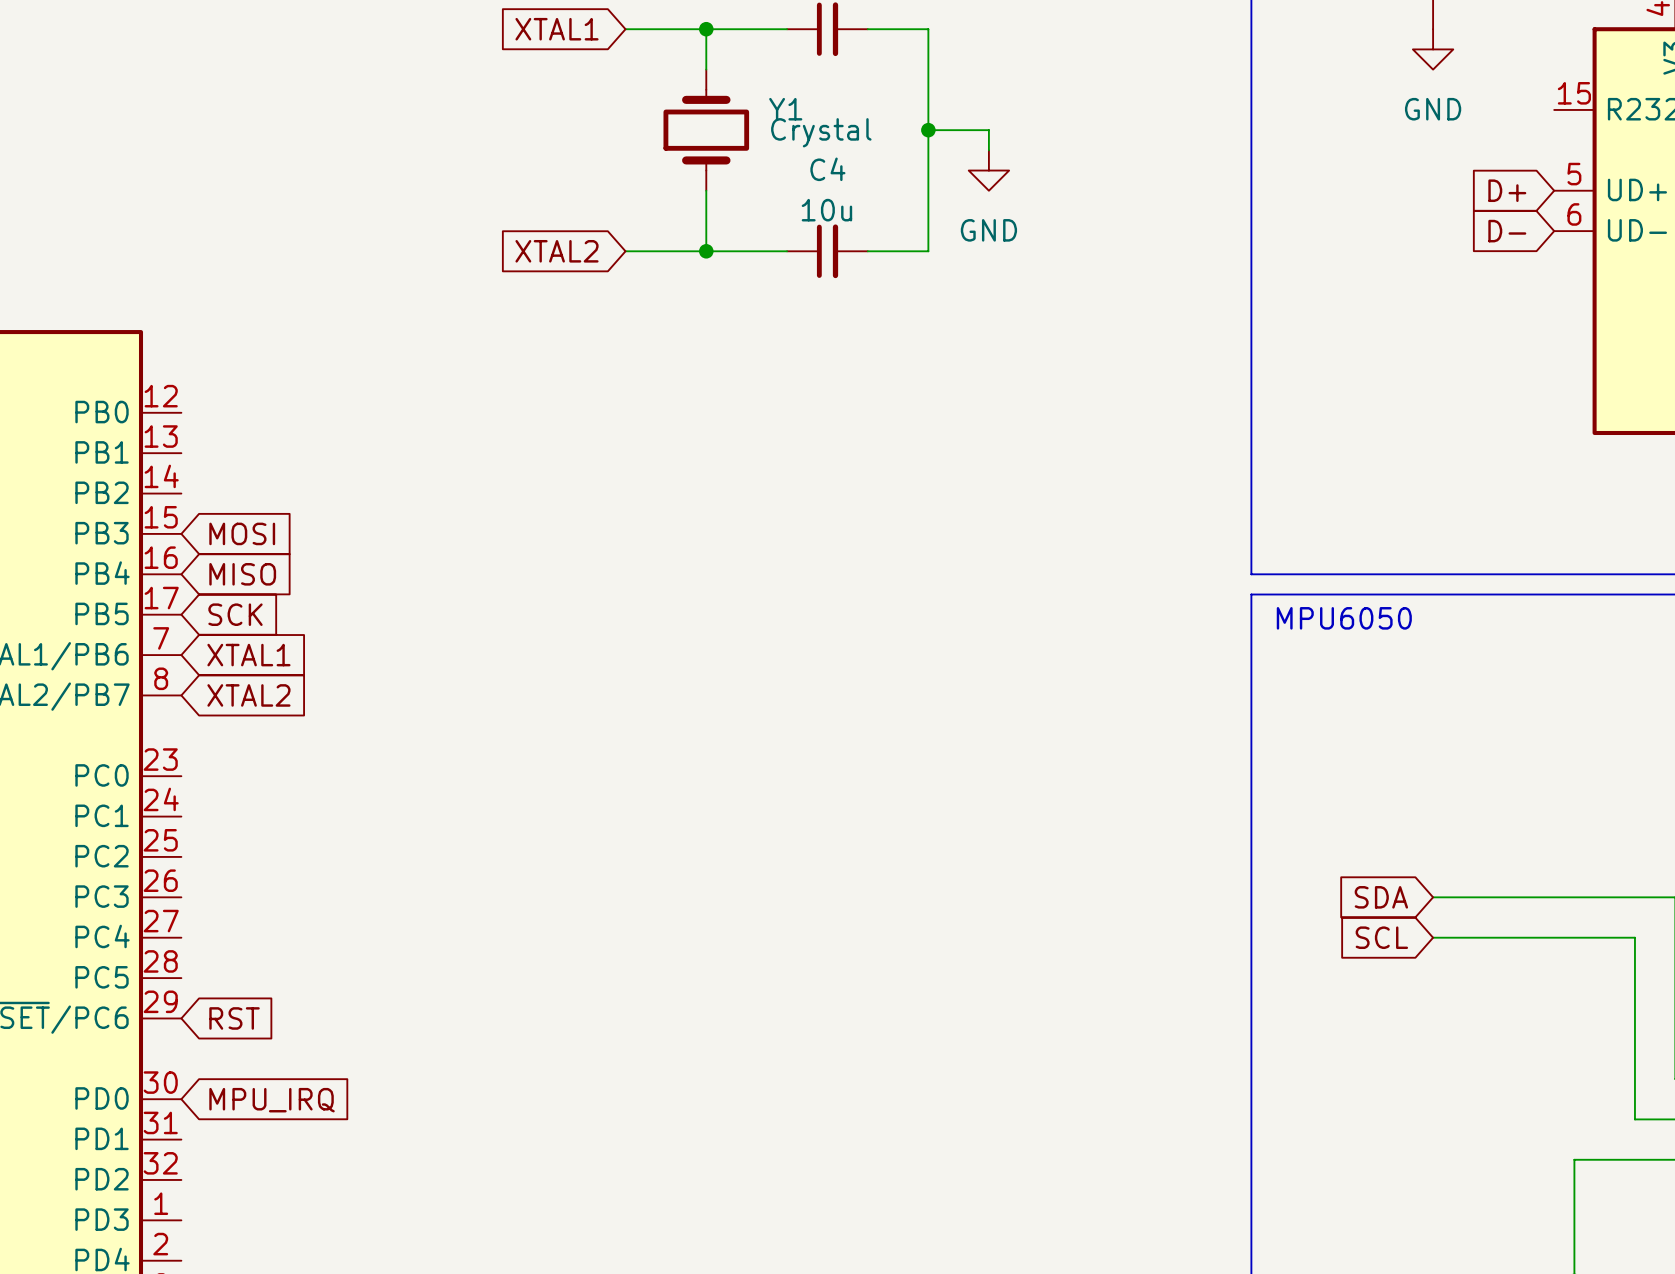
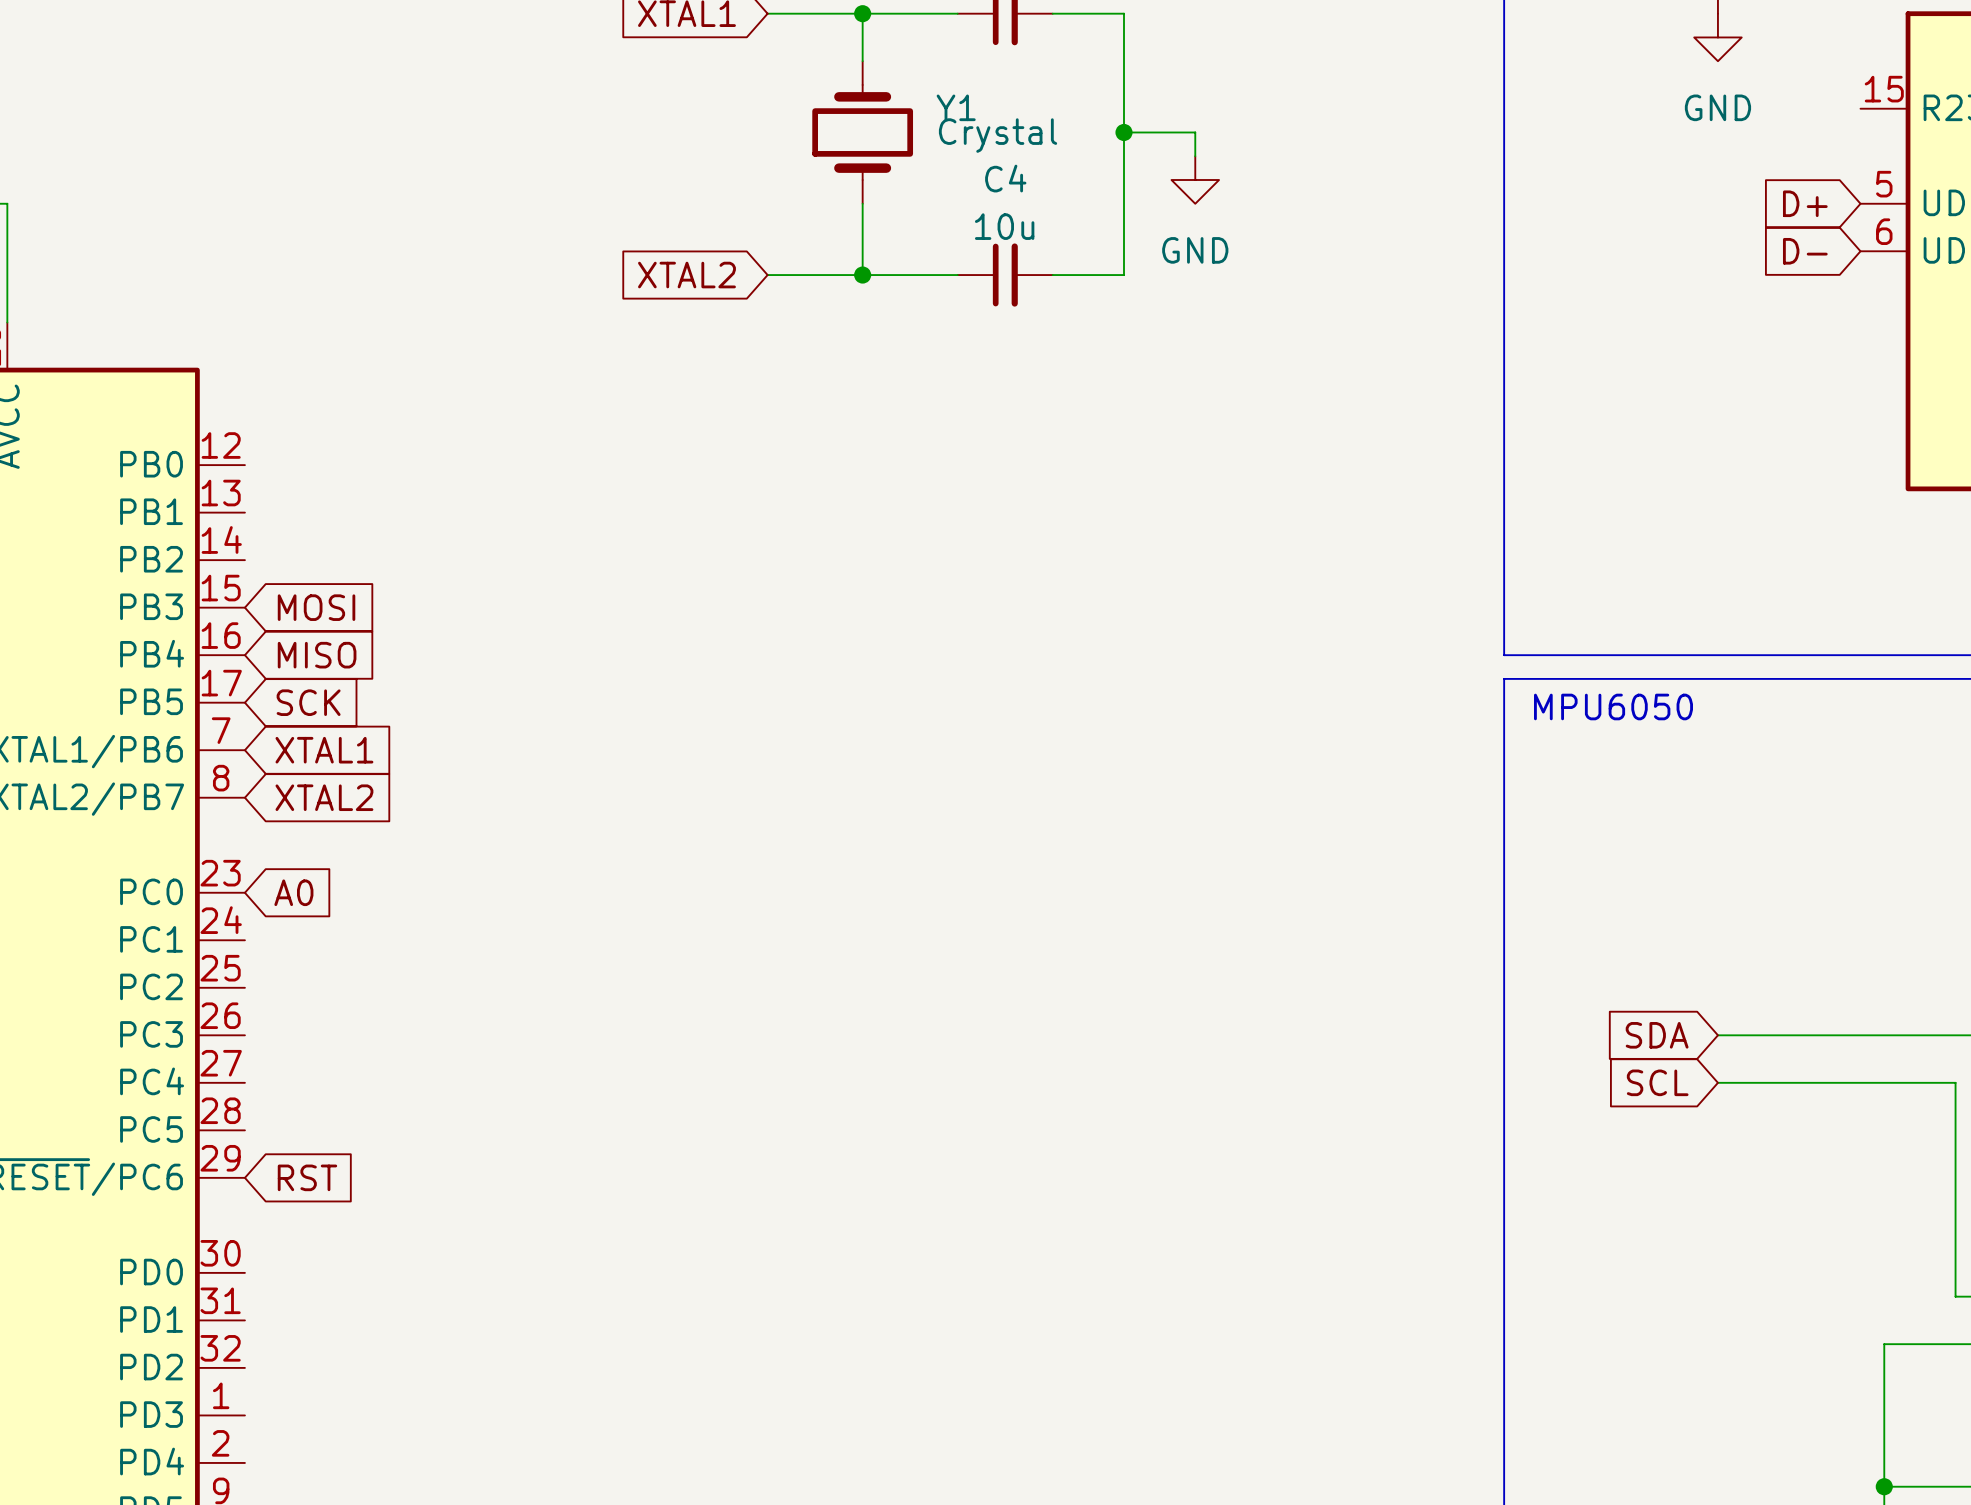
global label: none -> A0 (293, 892)
global label: MPU_IRQ (272, 1100) -> none

